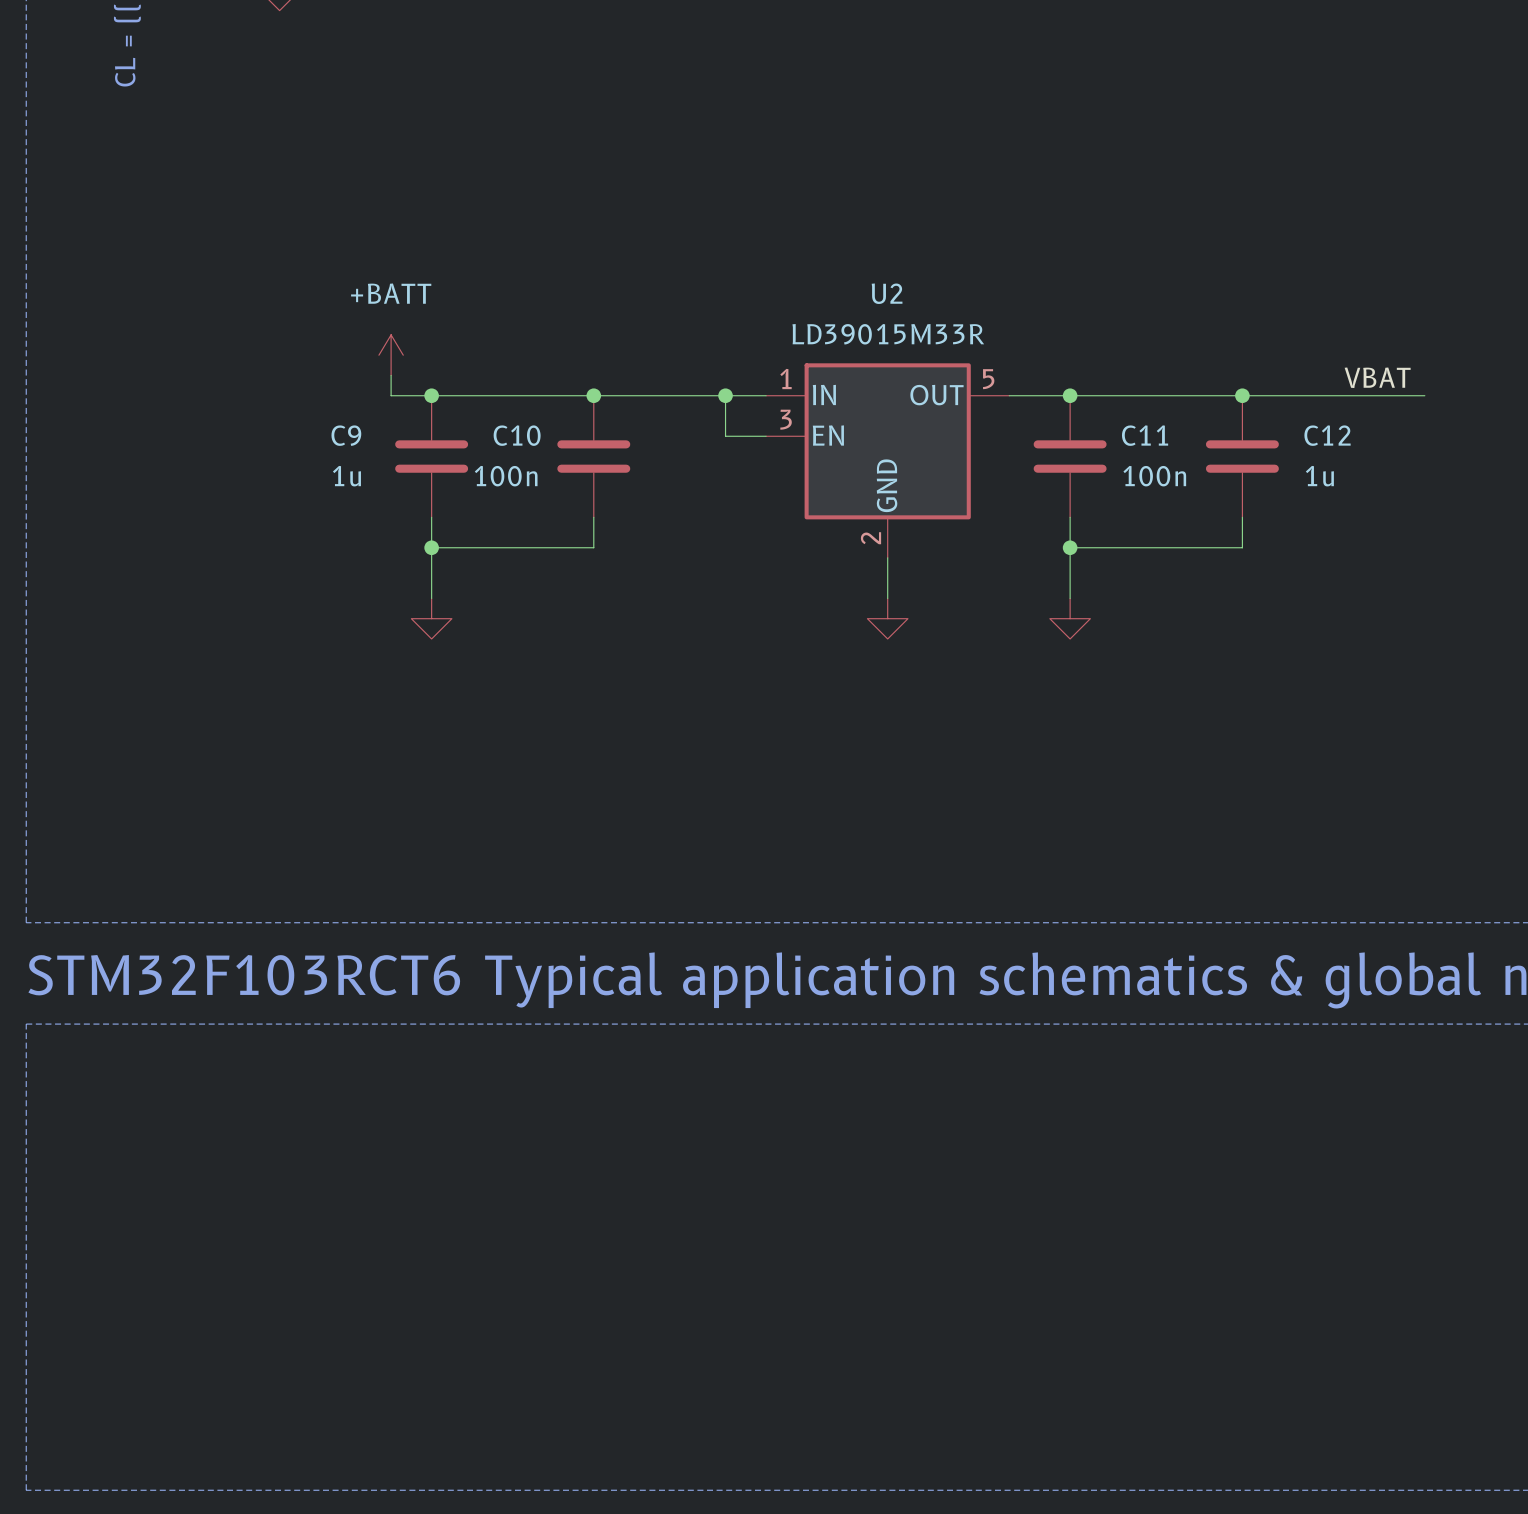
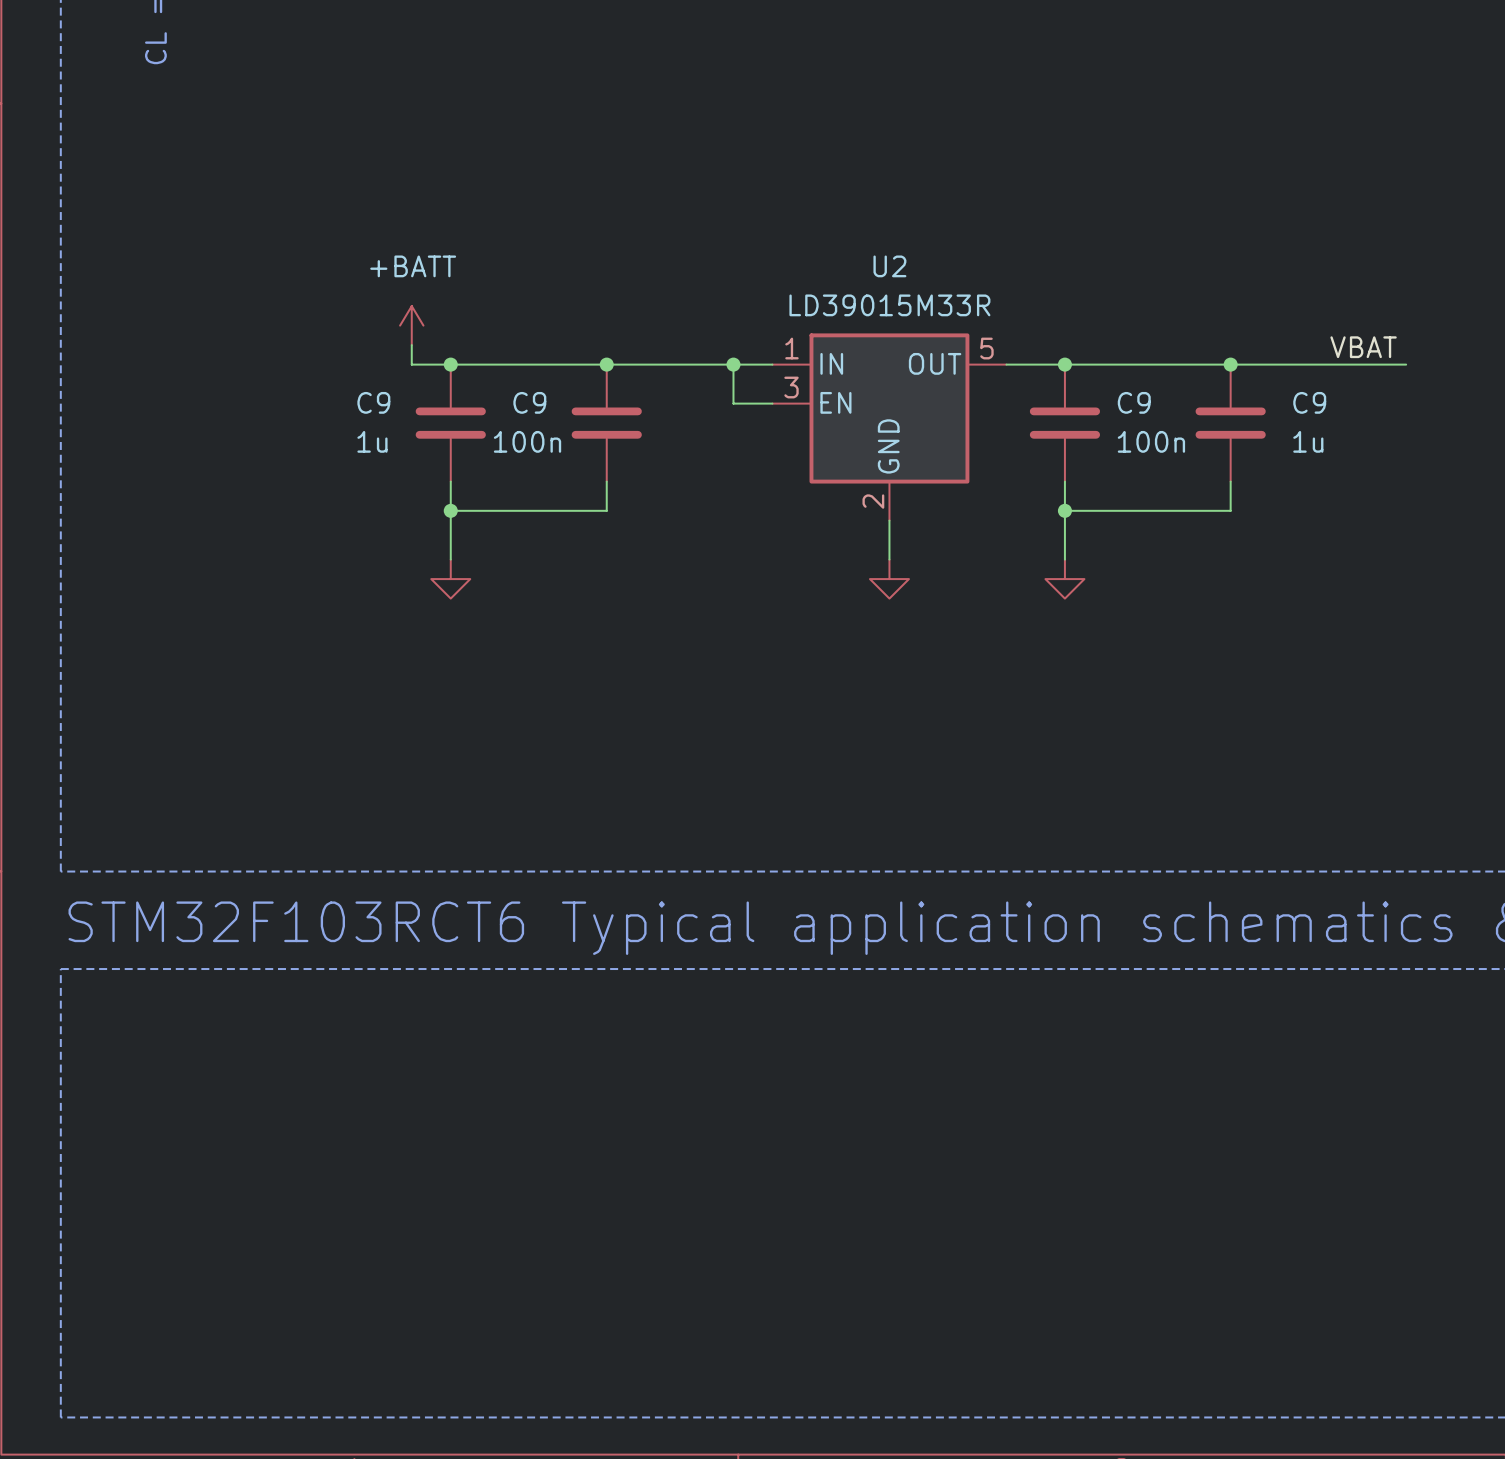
C10 name: C10 (517, 435) -> C9 (529, 402)
C11 name: C11 (1145, 435) -> C9 (1134, 402)
C12 name: C12 (1327, 435) -> C9 (1309, 402)

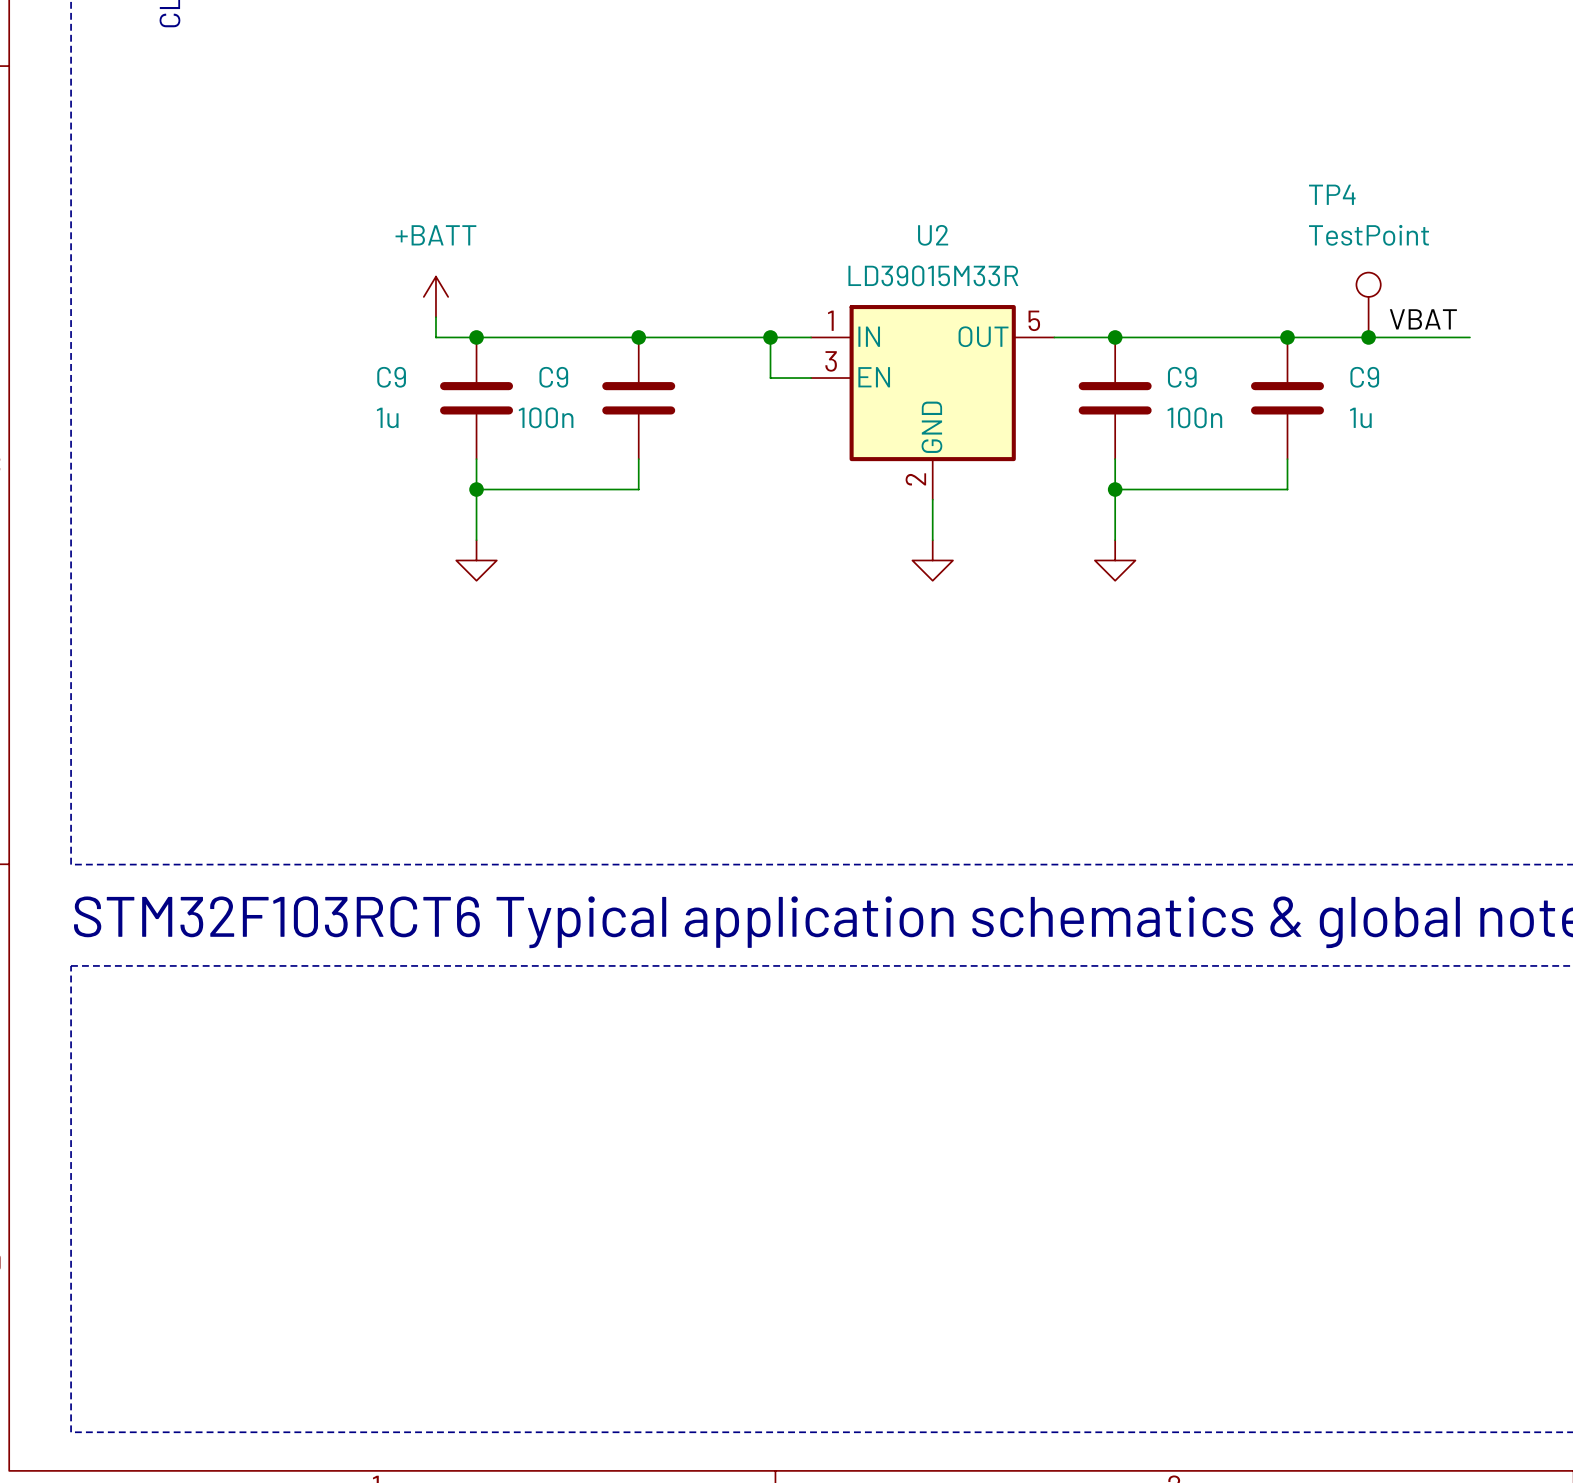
TP4: none -> TestPoint (1368, 305)
junction: none -> (1368, 337)

